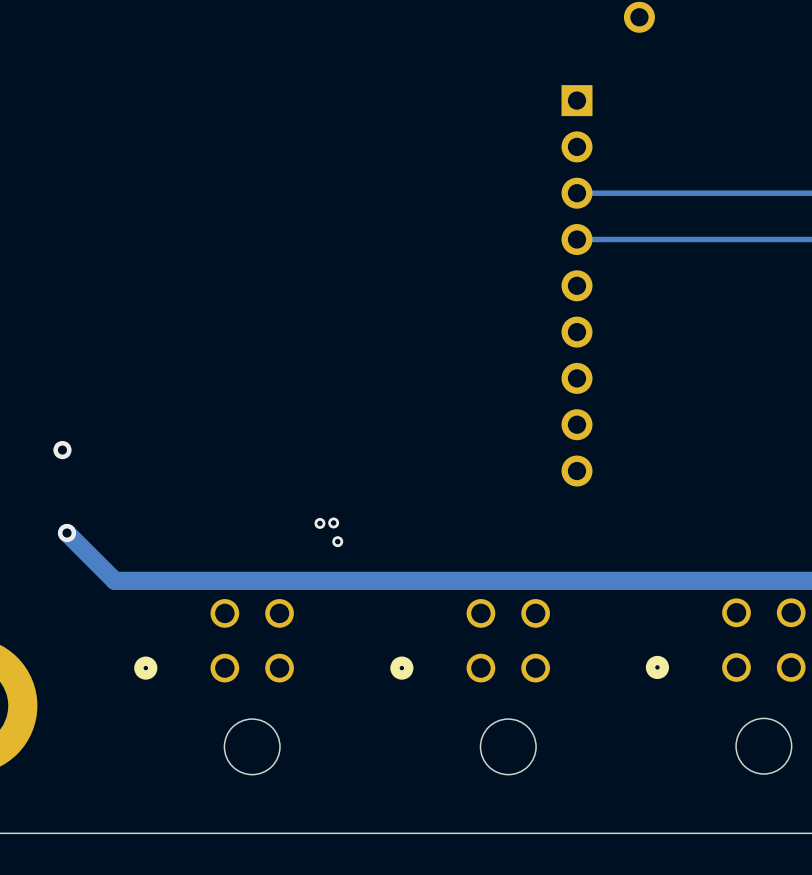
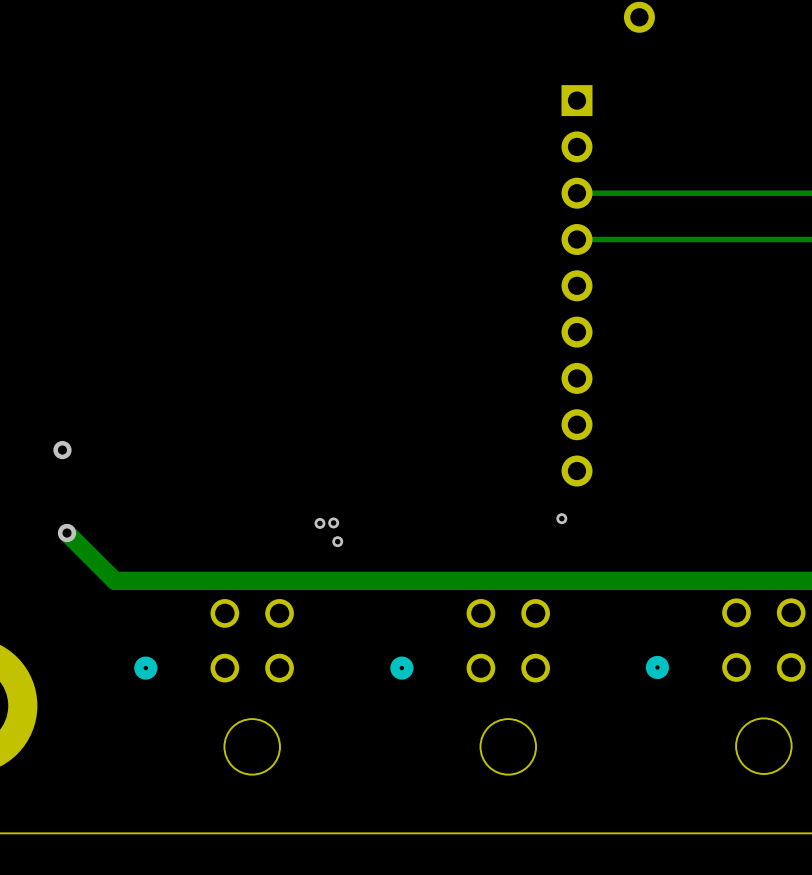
via: none -> (561, 518)

